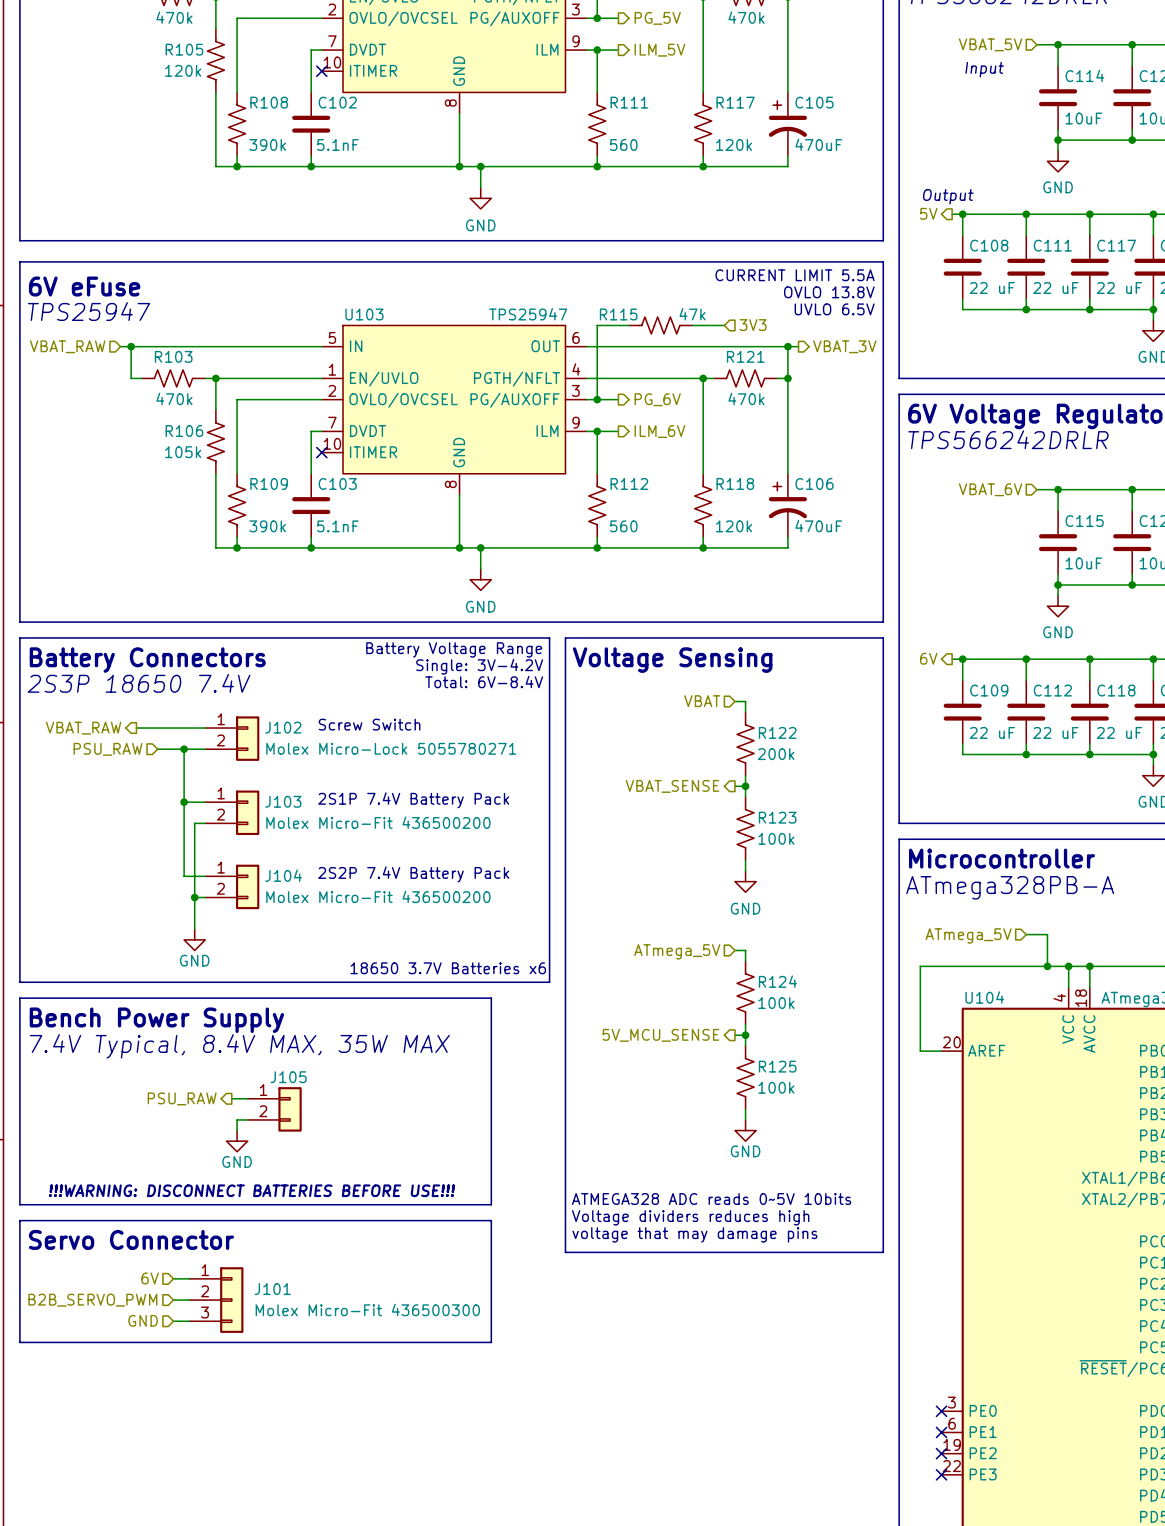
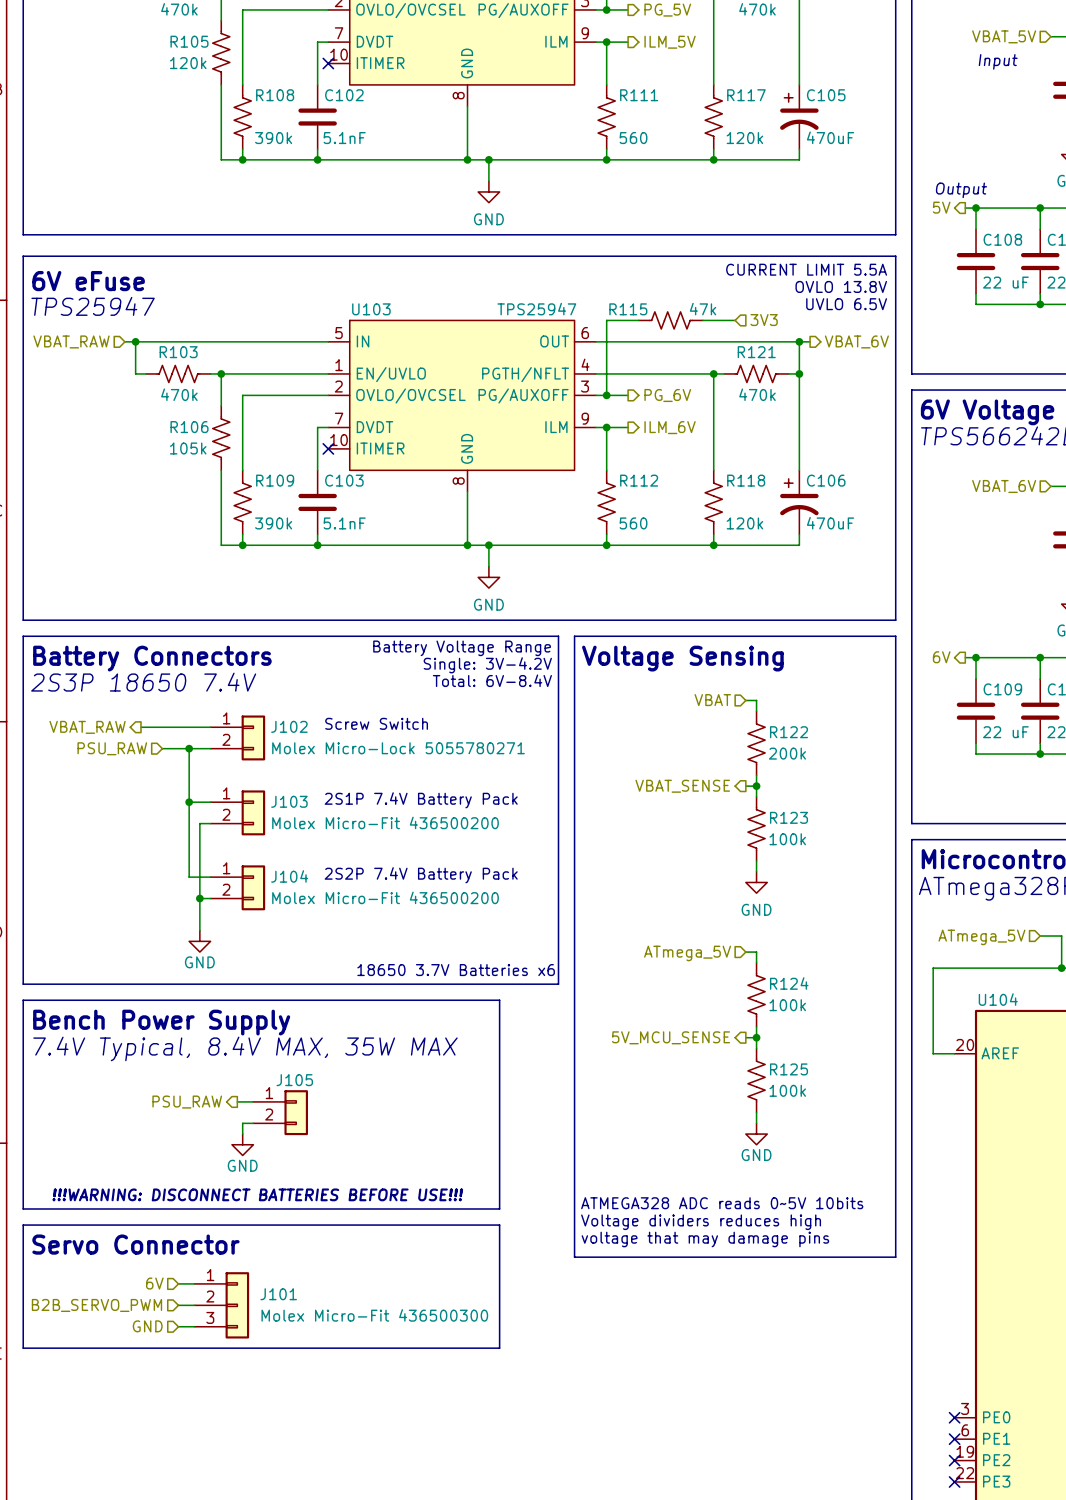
hierarchical label: VBAT_3V (844, 346) -> VBAT_6V (856, 341)

